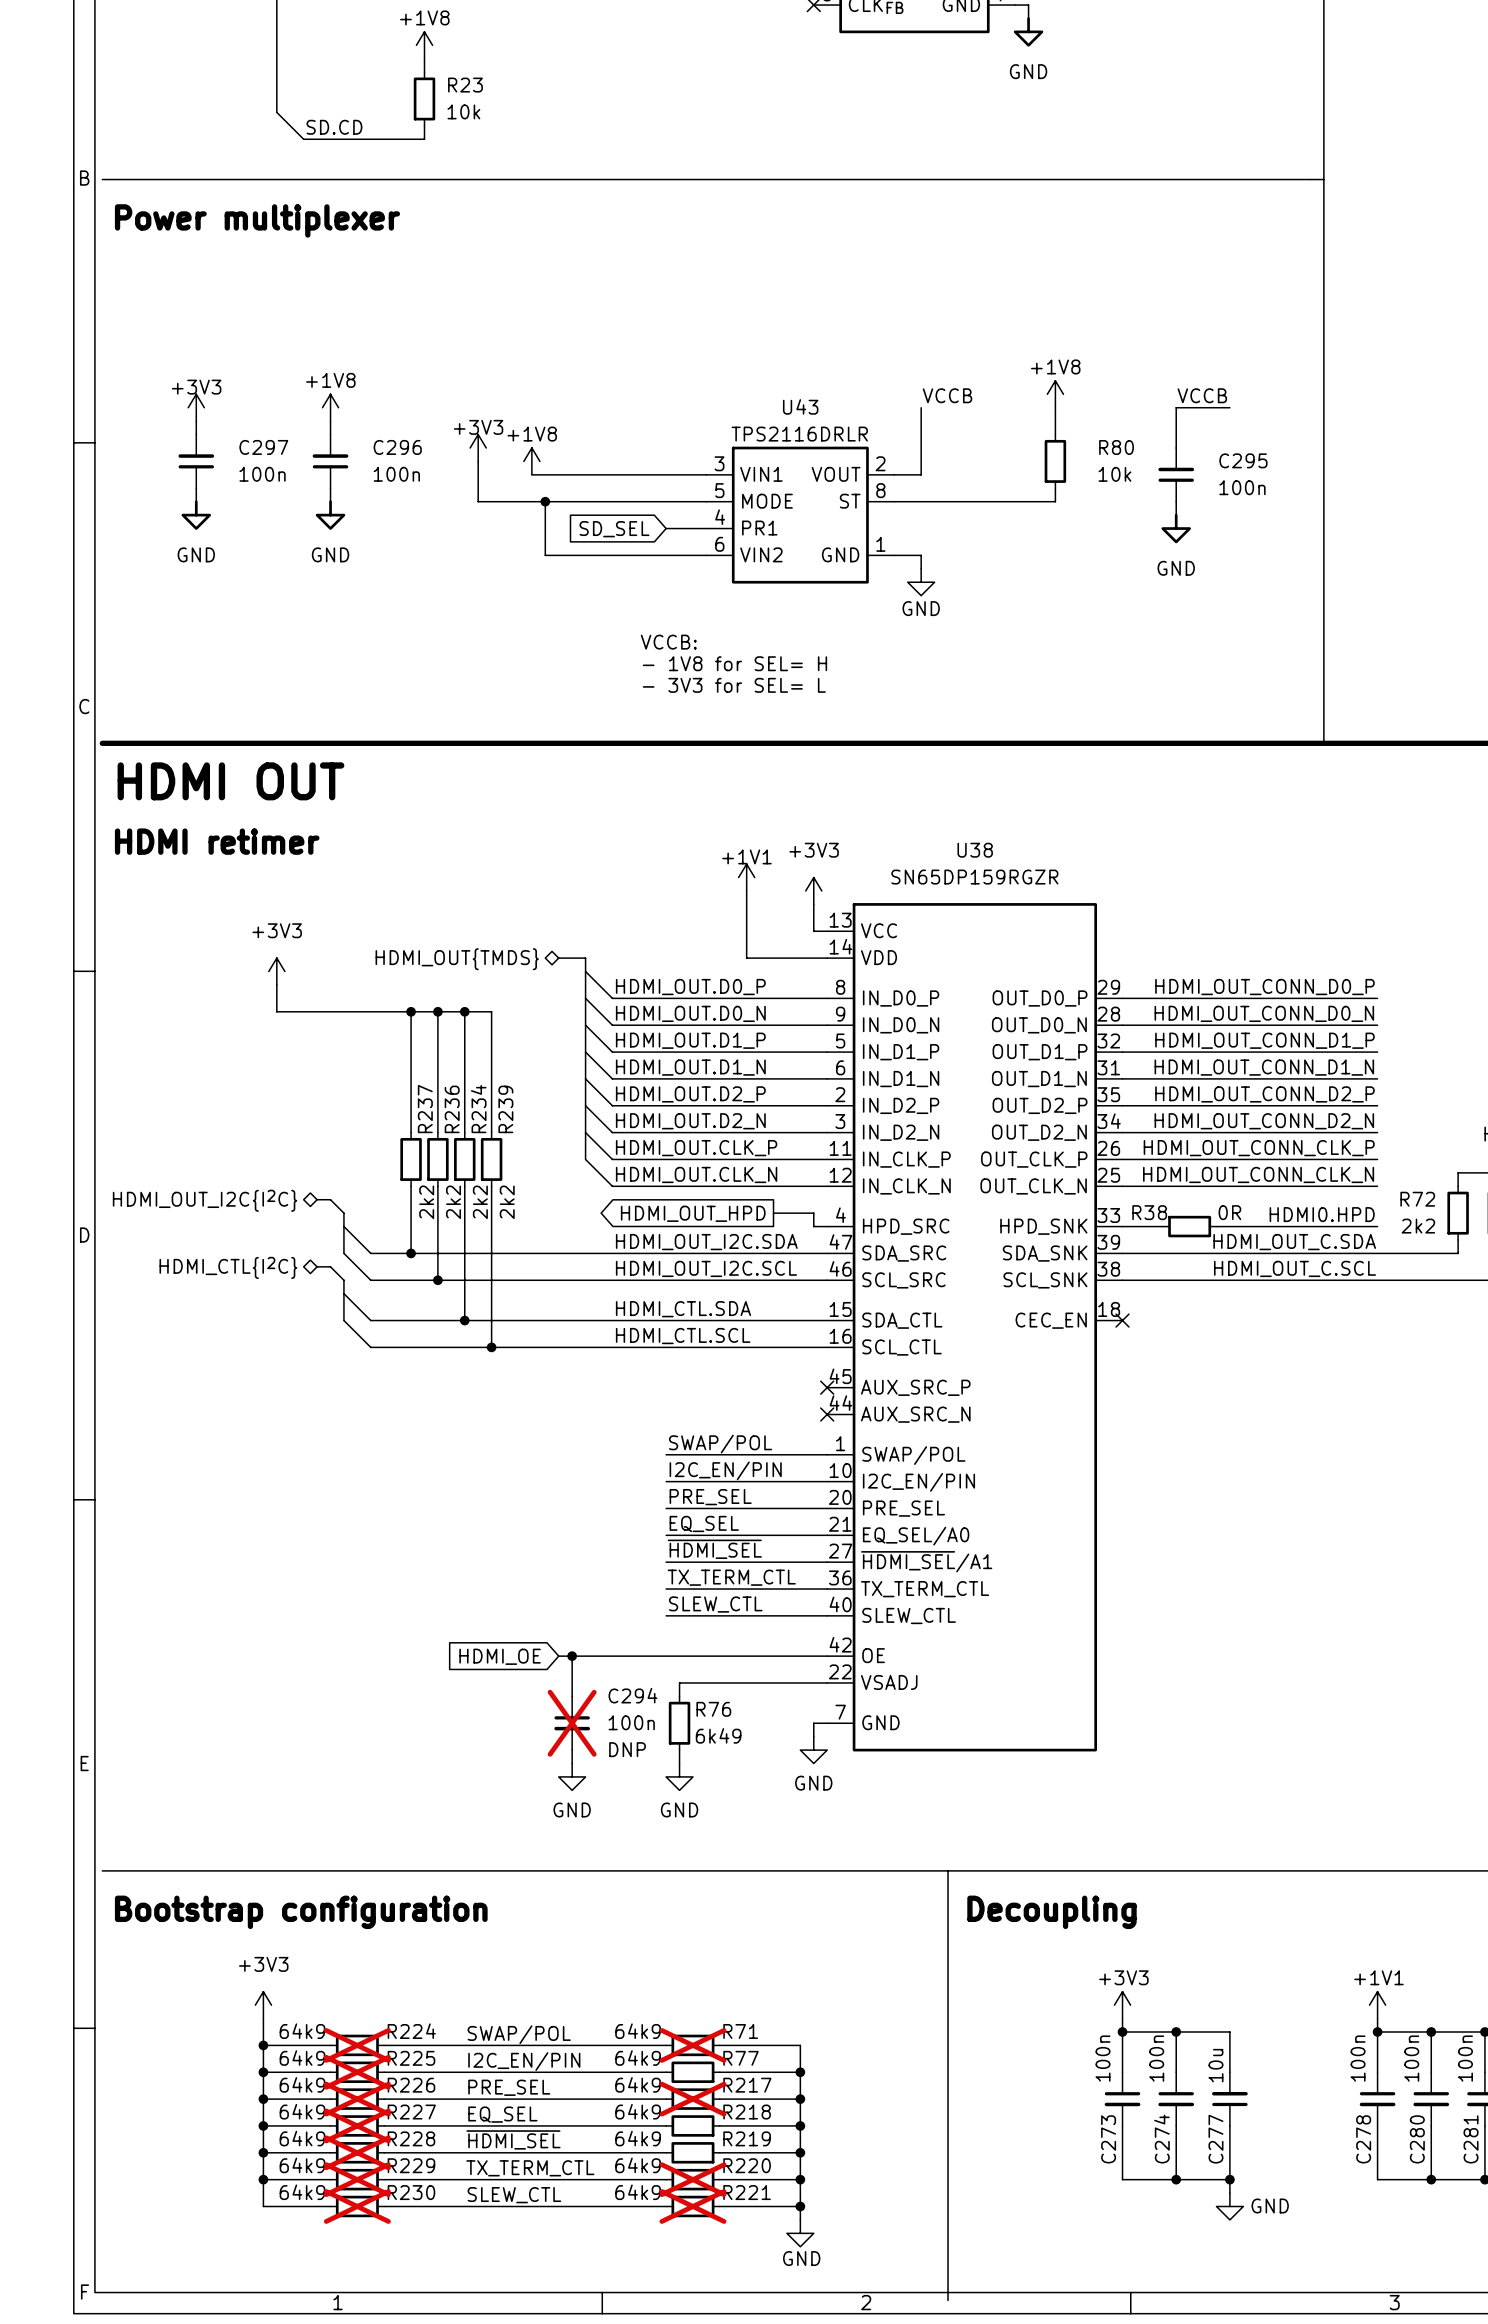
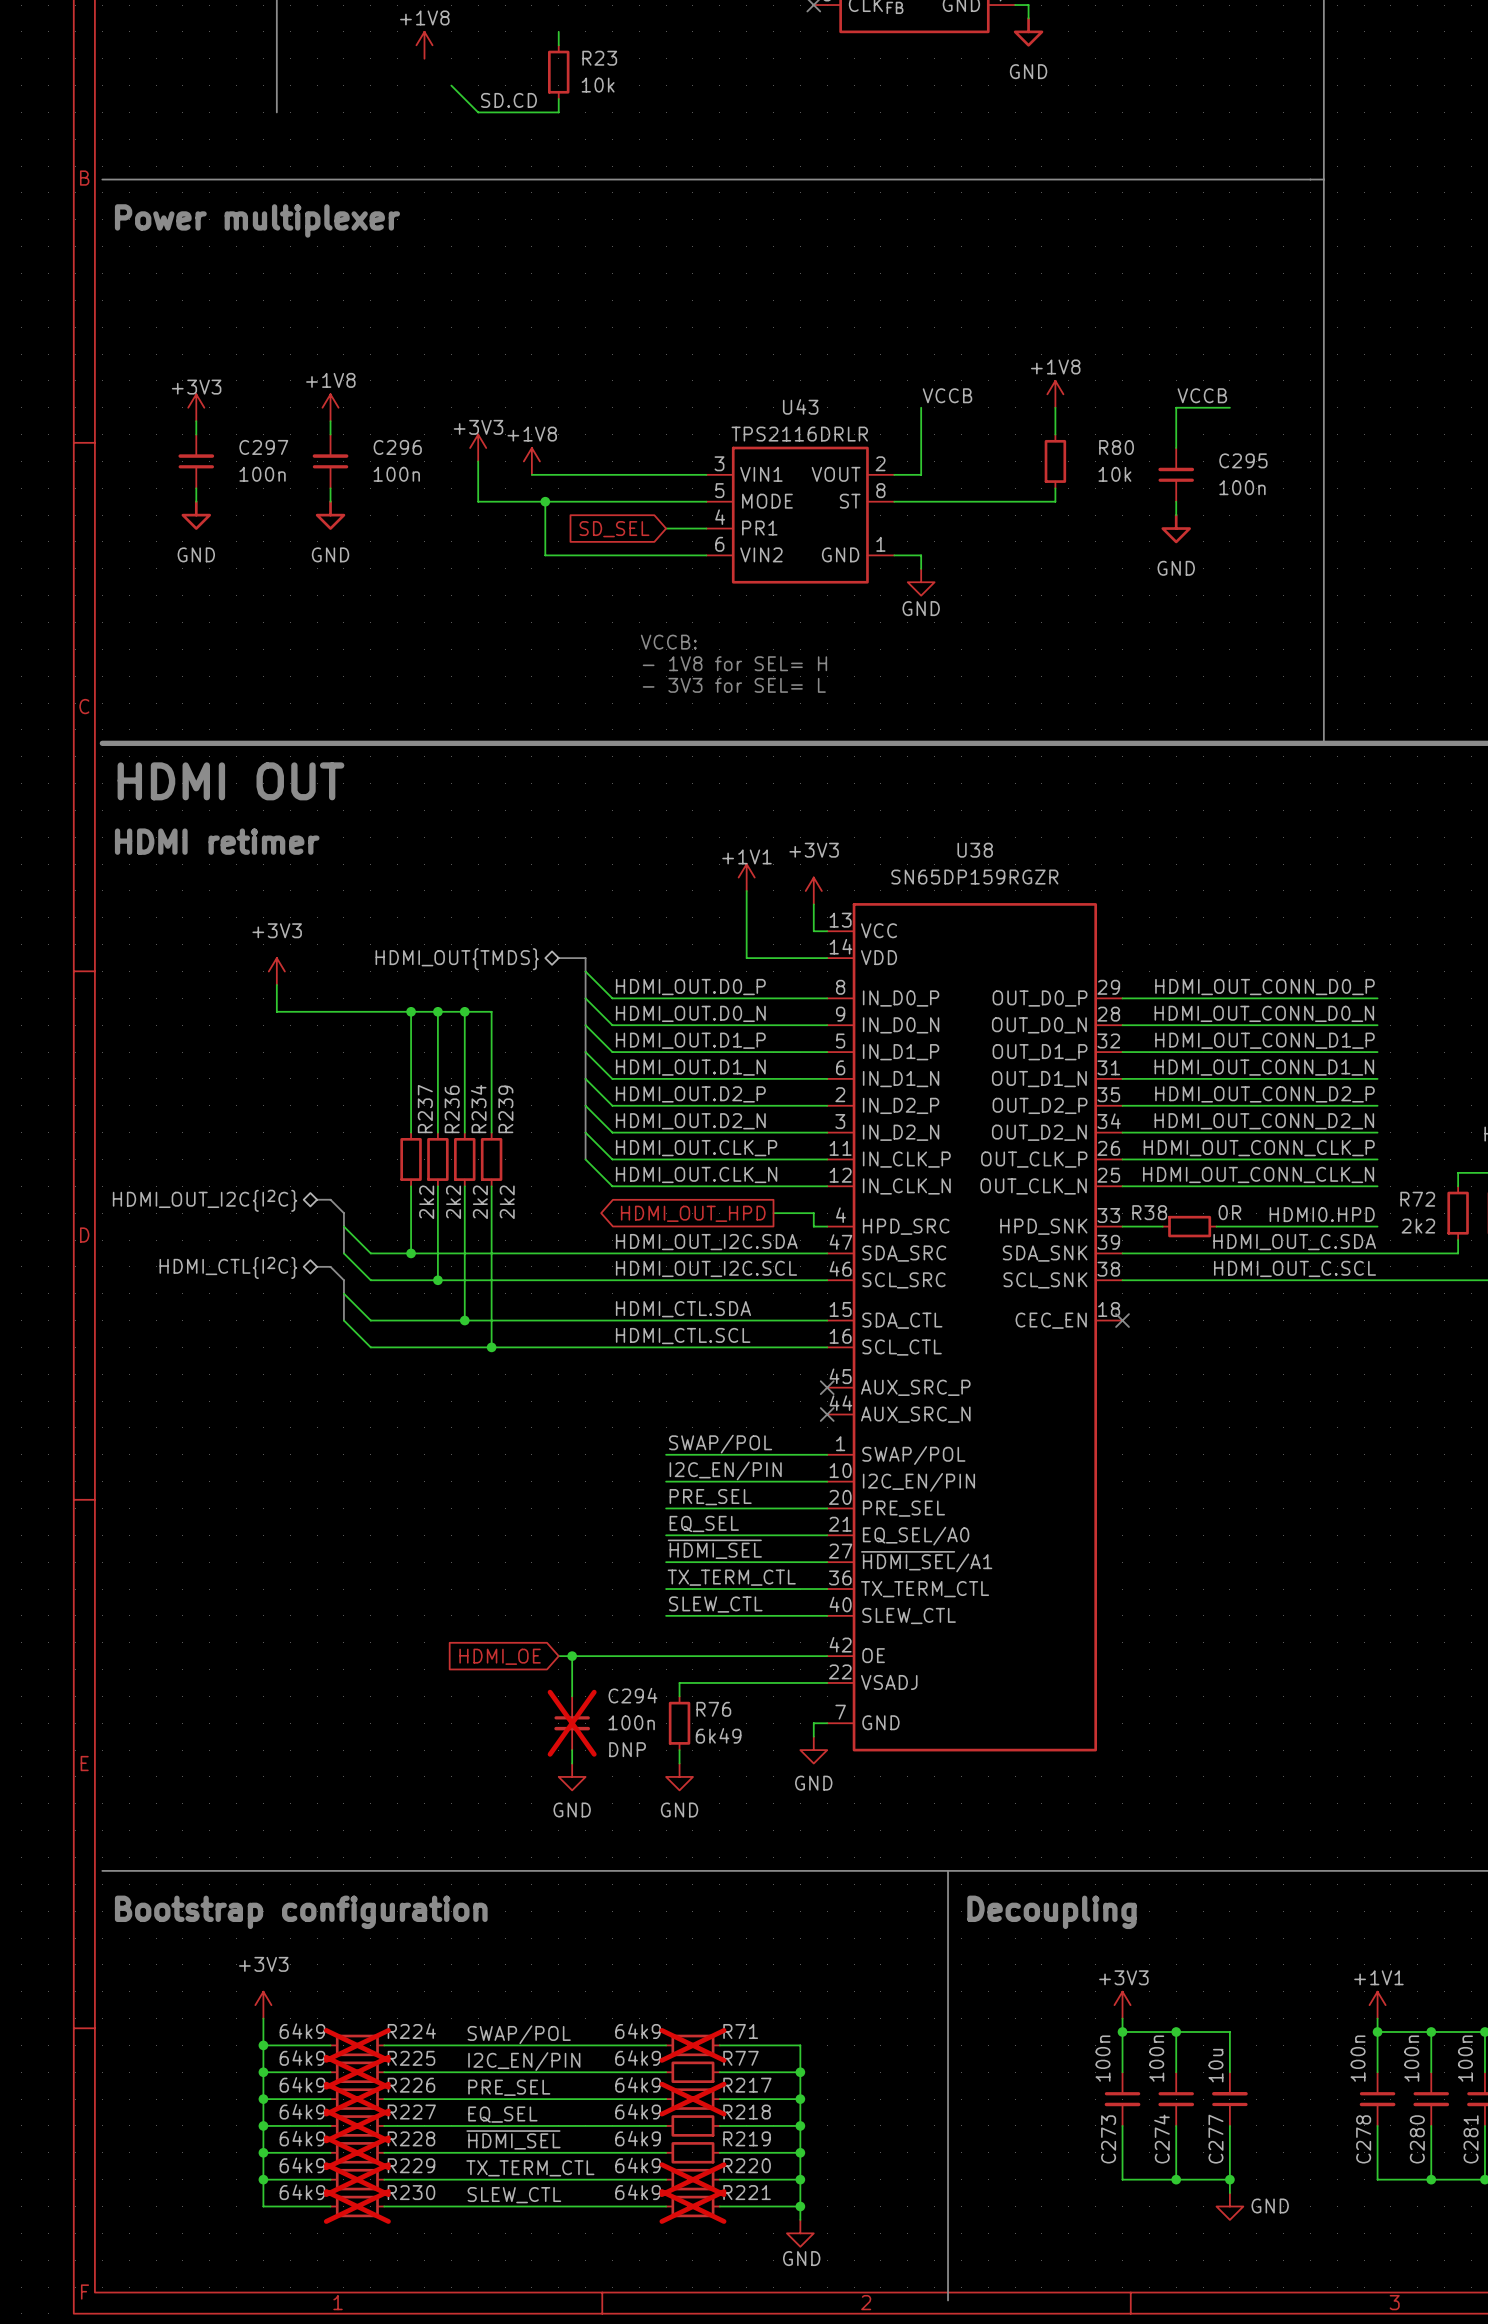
wire: (424, 58) (424, 72) -> (558, 31) (558, 45)
wire: none -> (451, 85) (478, 112) (558, 112) (558, 98)
R23 position: (424, 98) -> (558, 72)
wire: (276, 112) (303, 139) (424, 139) (424, 125) -> none
label position: SD.CD (334, 127) -> SD.CD (508, 100)

